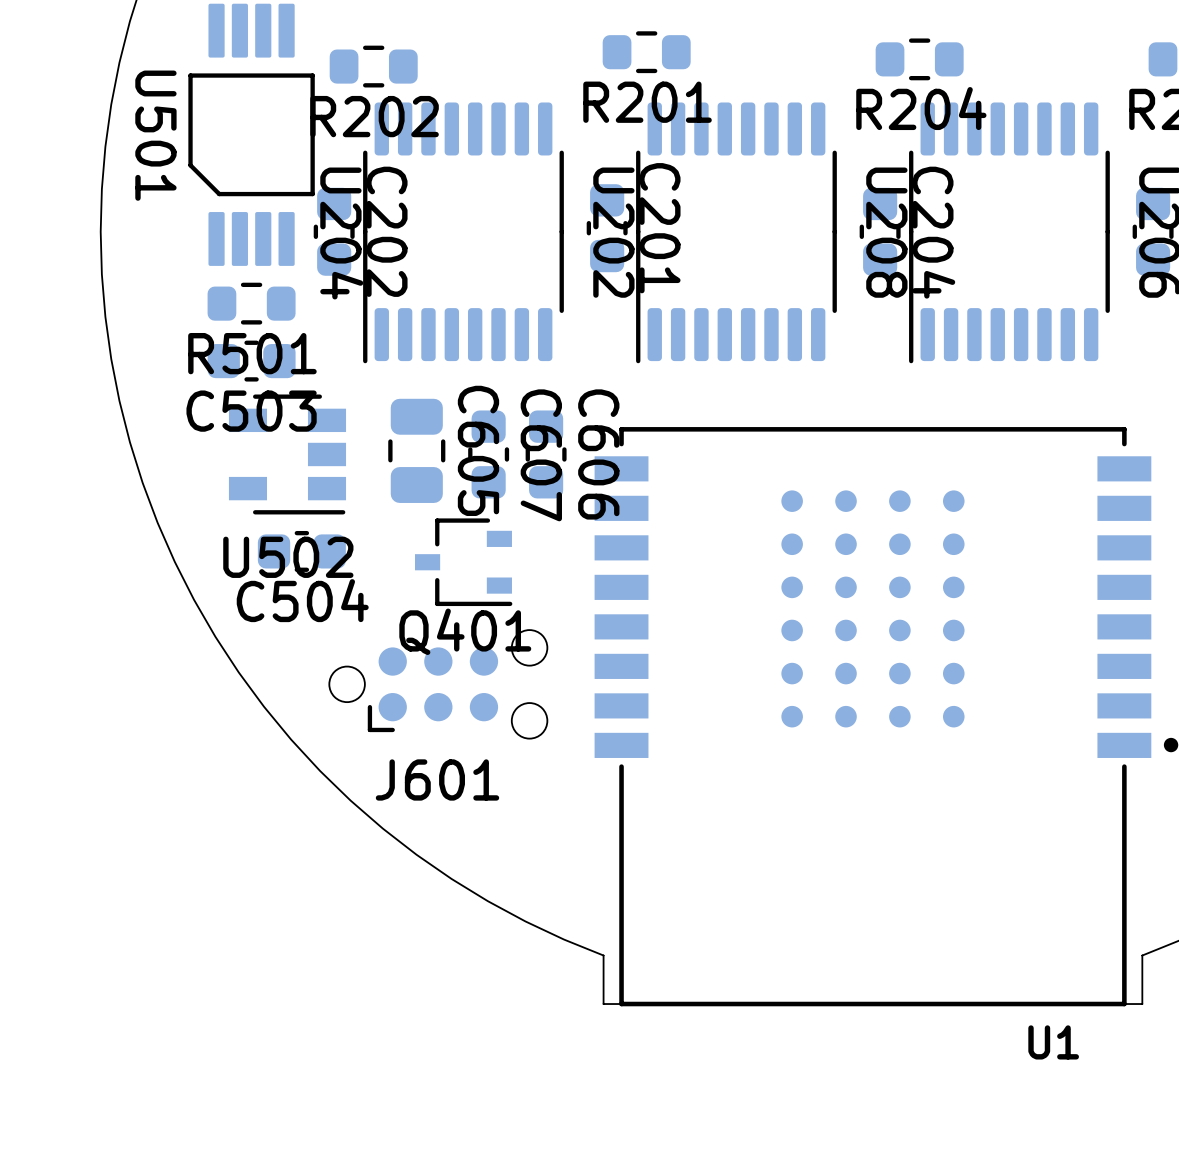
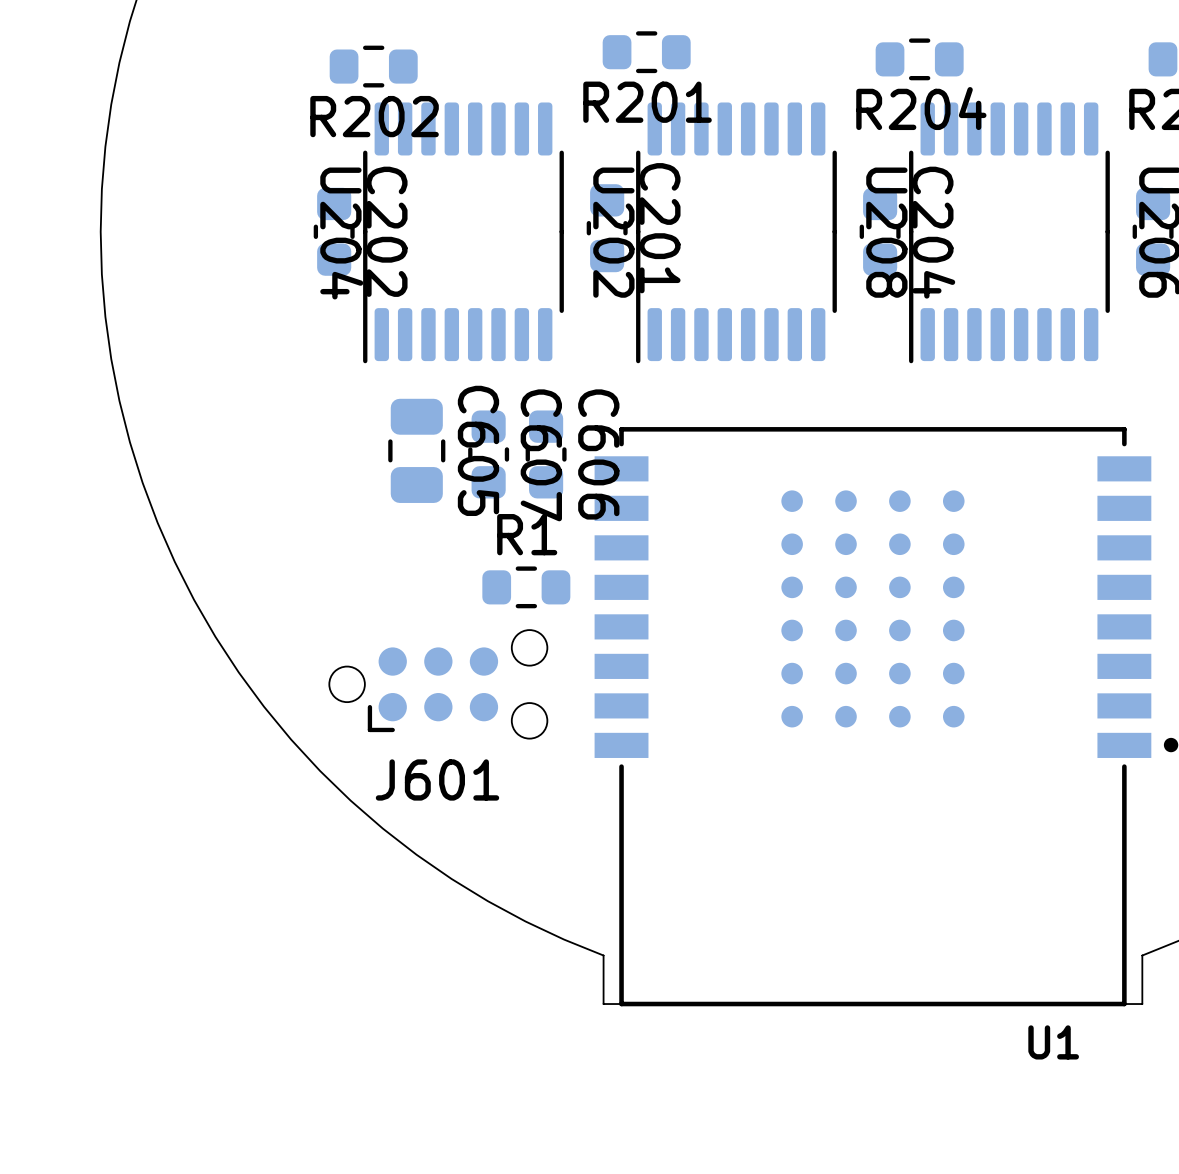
U501: (251, 134) -> none
R501: (251, 303) -> none
C503: (251, 361) -> none
U502: (287, 454) -> none
C504: (301, 551) -> none
Q401: (463, 562) -> none
R1: none -> (526, 587)

